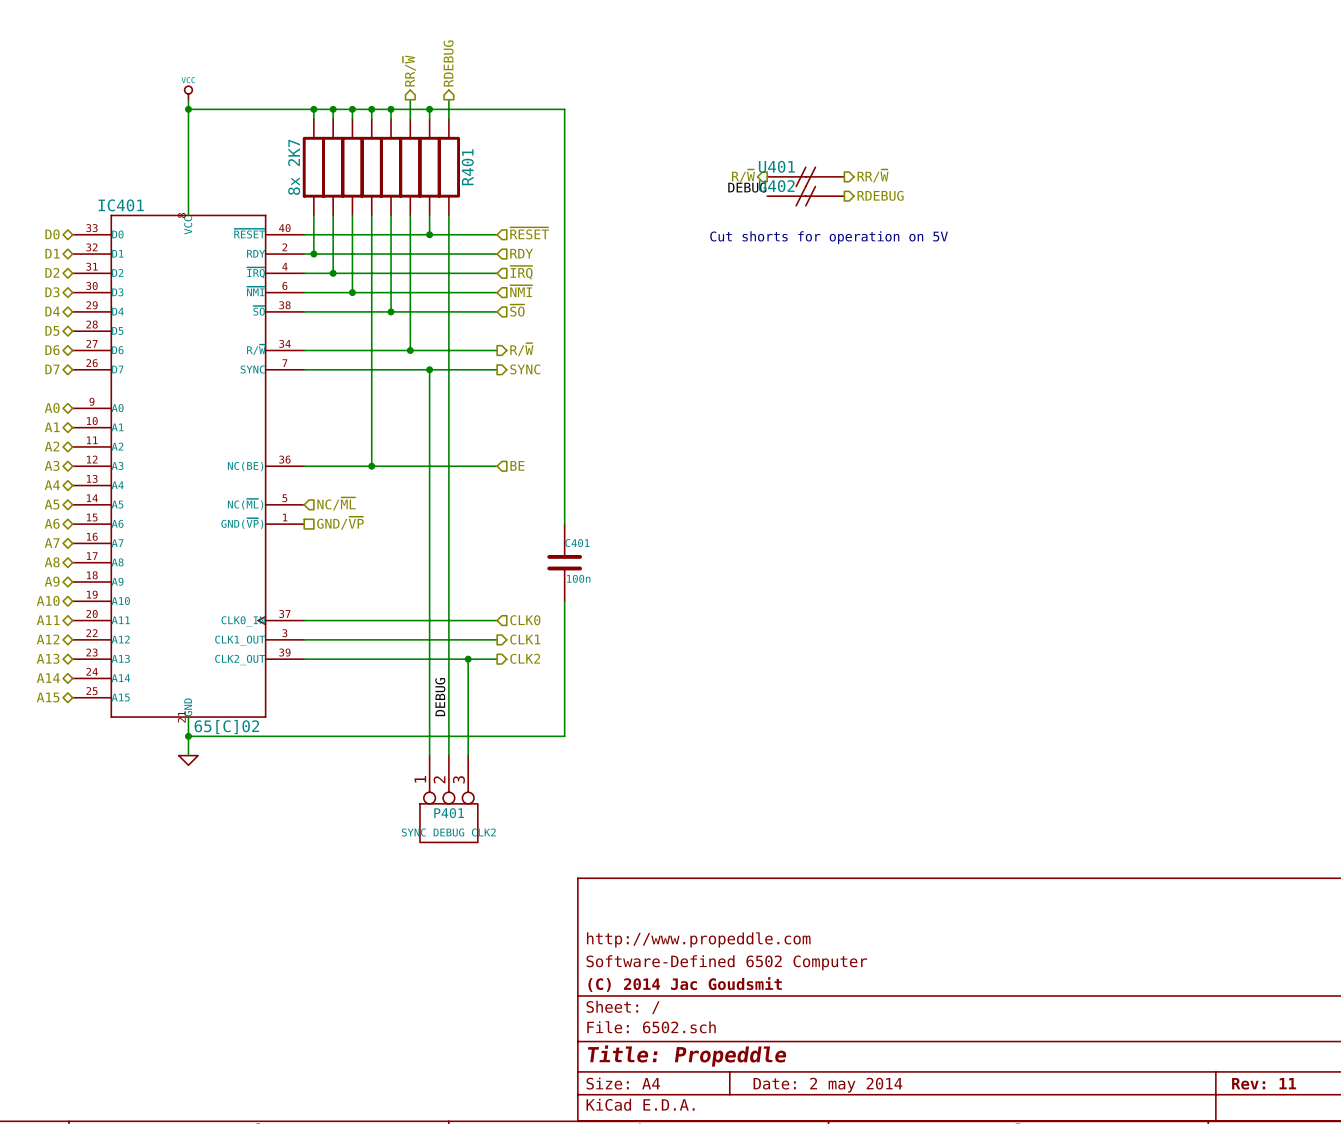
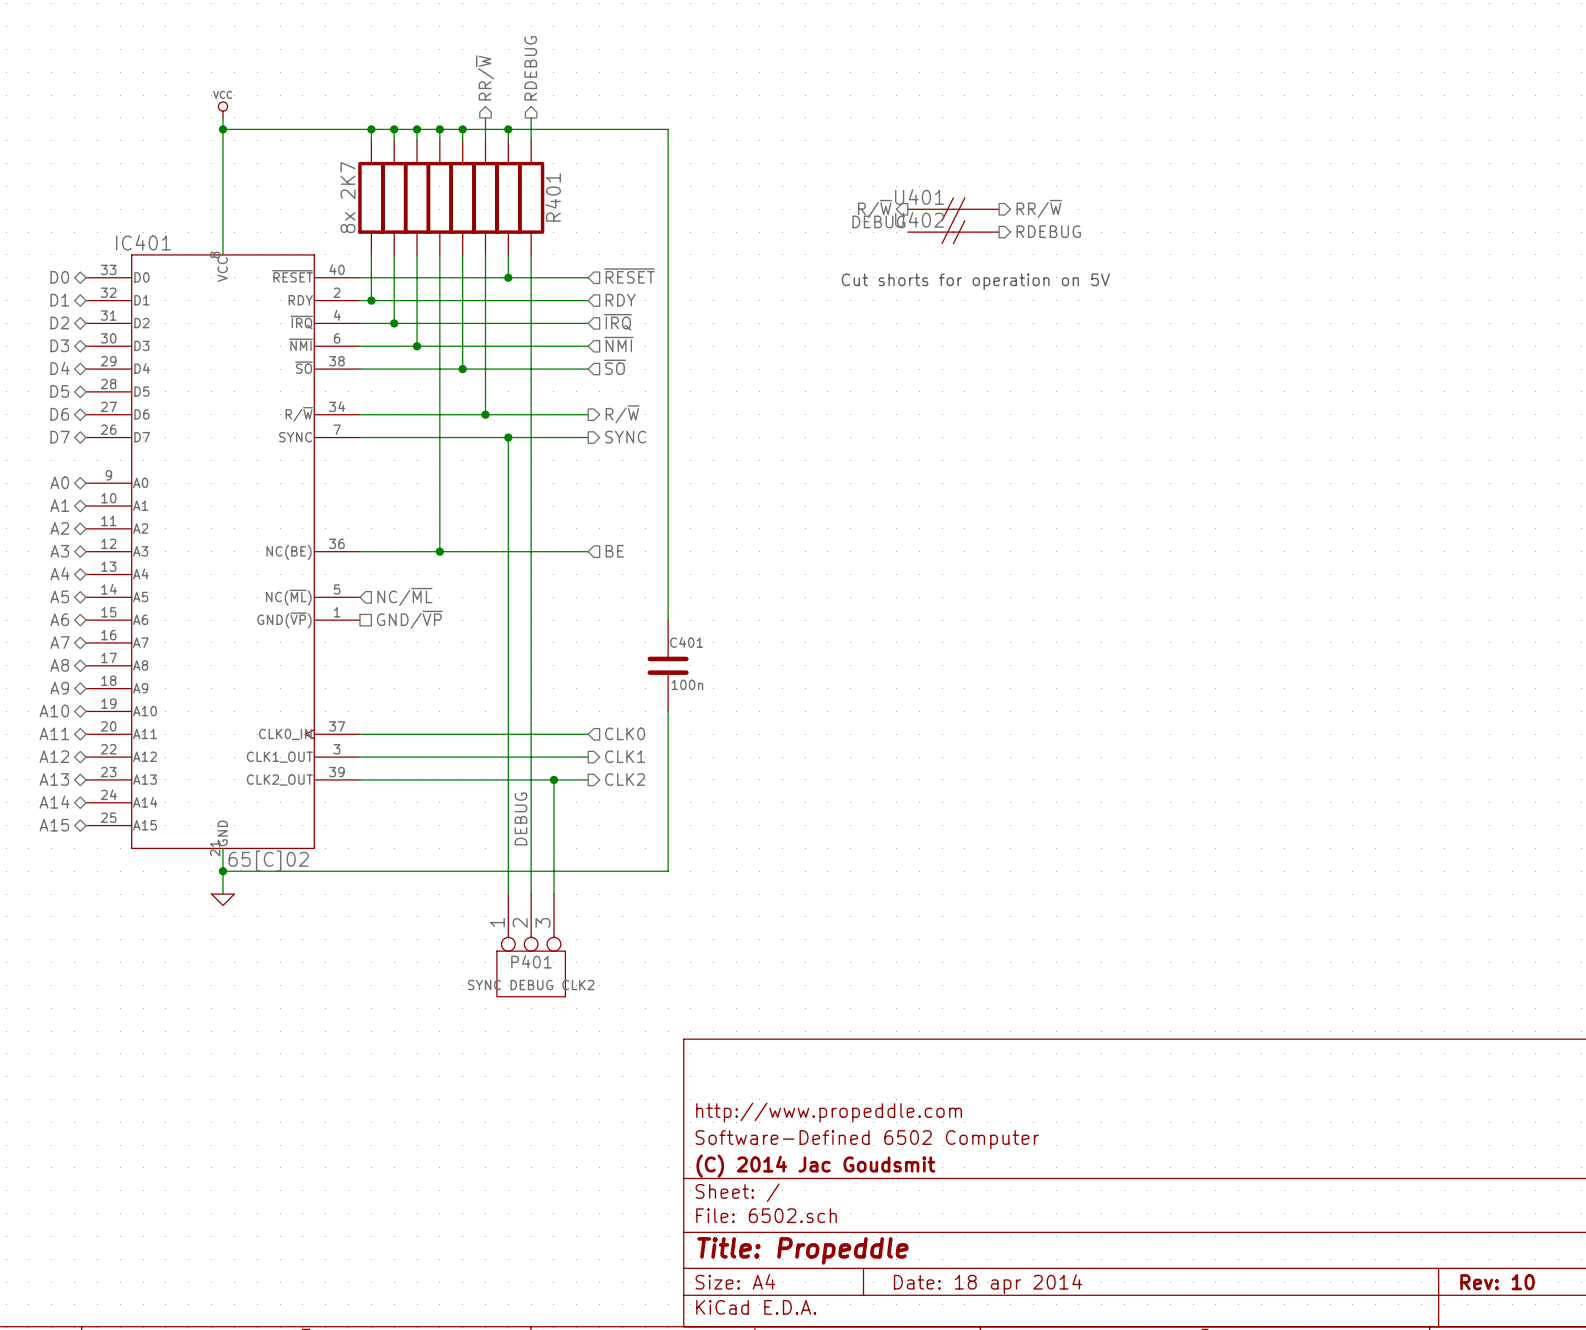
title block: Rev: 11 (1264, 1083) -> Rev: 10 (1497, 1282)
title block: Date: 2 may 2014 (827, 1085) -> Date: 18 apr 2014 (987, 1284)

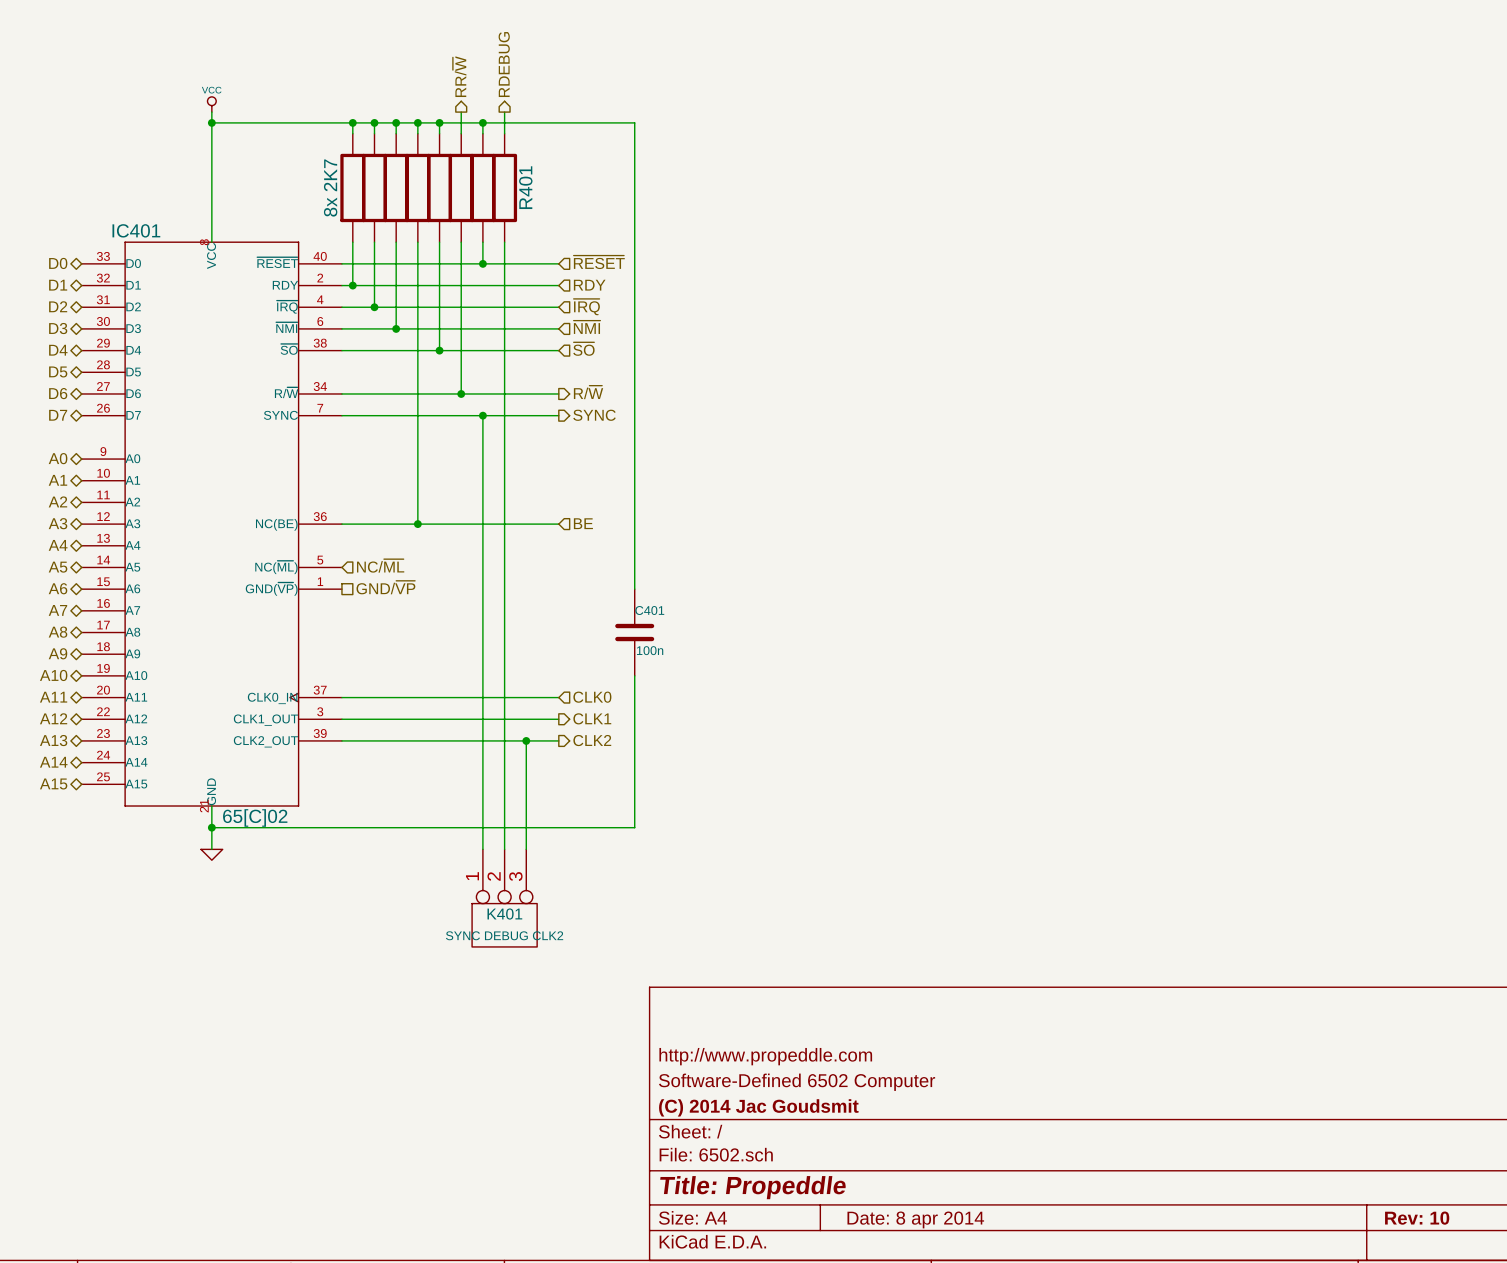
hierarchical label: R/~{W} (874, 208) -> none
hierarchical label: RR/~{W} (1039, 208) -> none
U401: (953, 209) -> none
label: DEBUG (878, 221) -> none
hierarchical label: RDEBUG (1048, 231) -> none
U402: (953, 232) -> none
text: Cut shorts for operation on 5V (975, 281) -> none
label: DEBUG (520, 818) -> none
P401 name: P401 (531, 961) -> K401 (504, 914)
title block: Date: 18 apr 2014 (987, 1284) -> Date: 8 apr 2014 (915, 1219)

